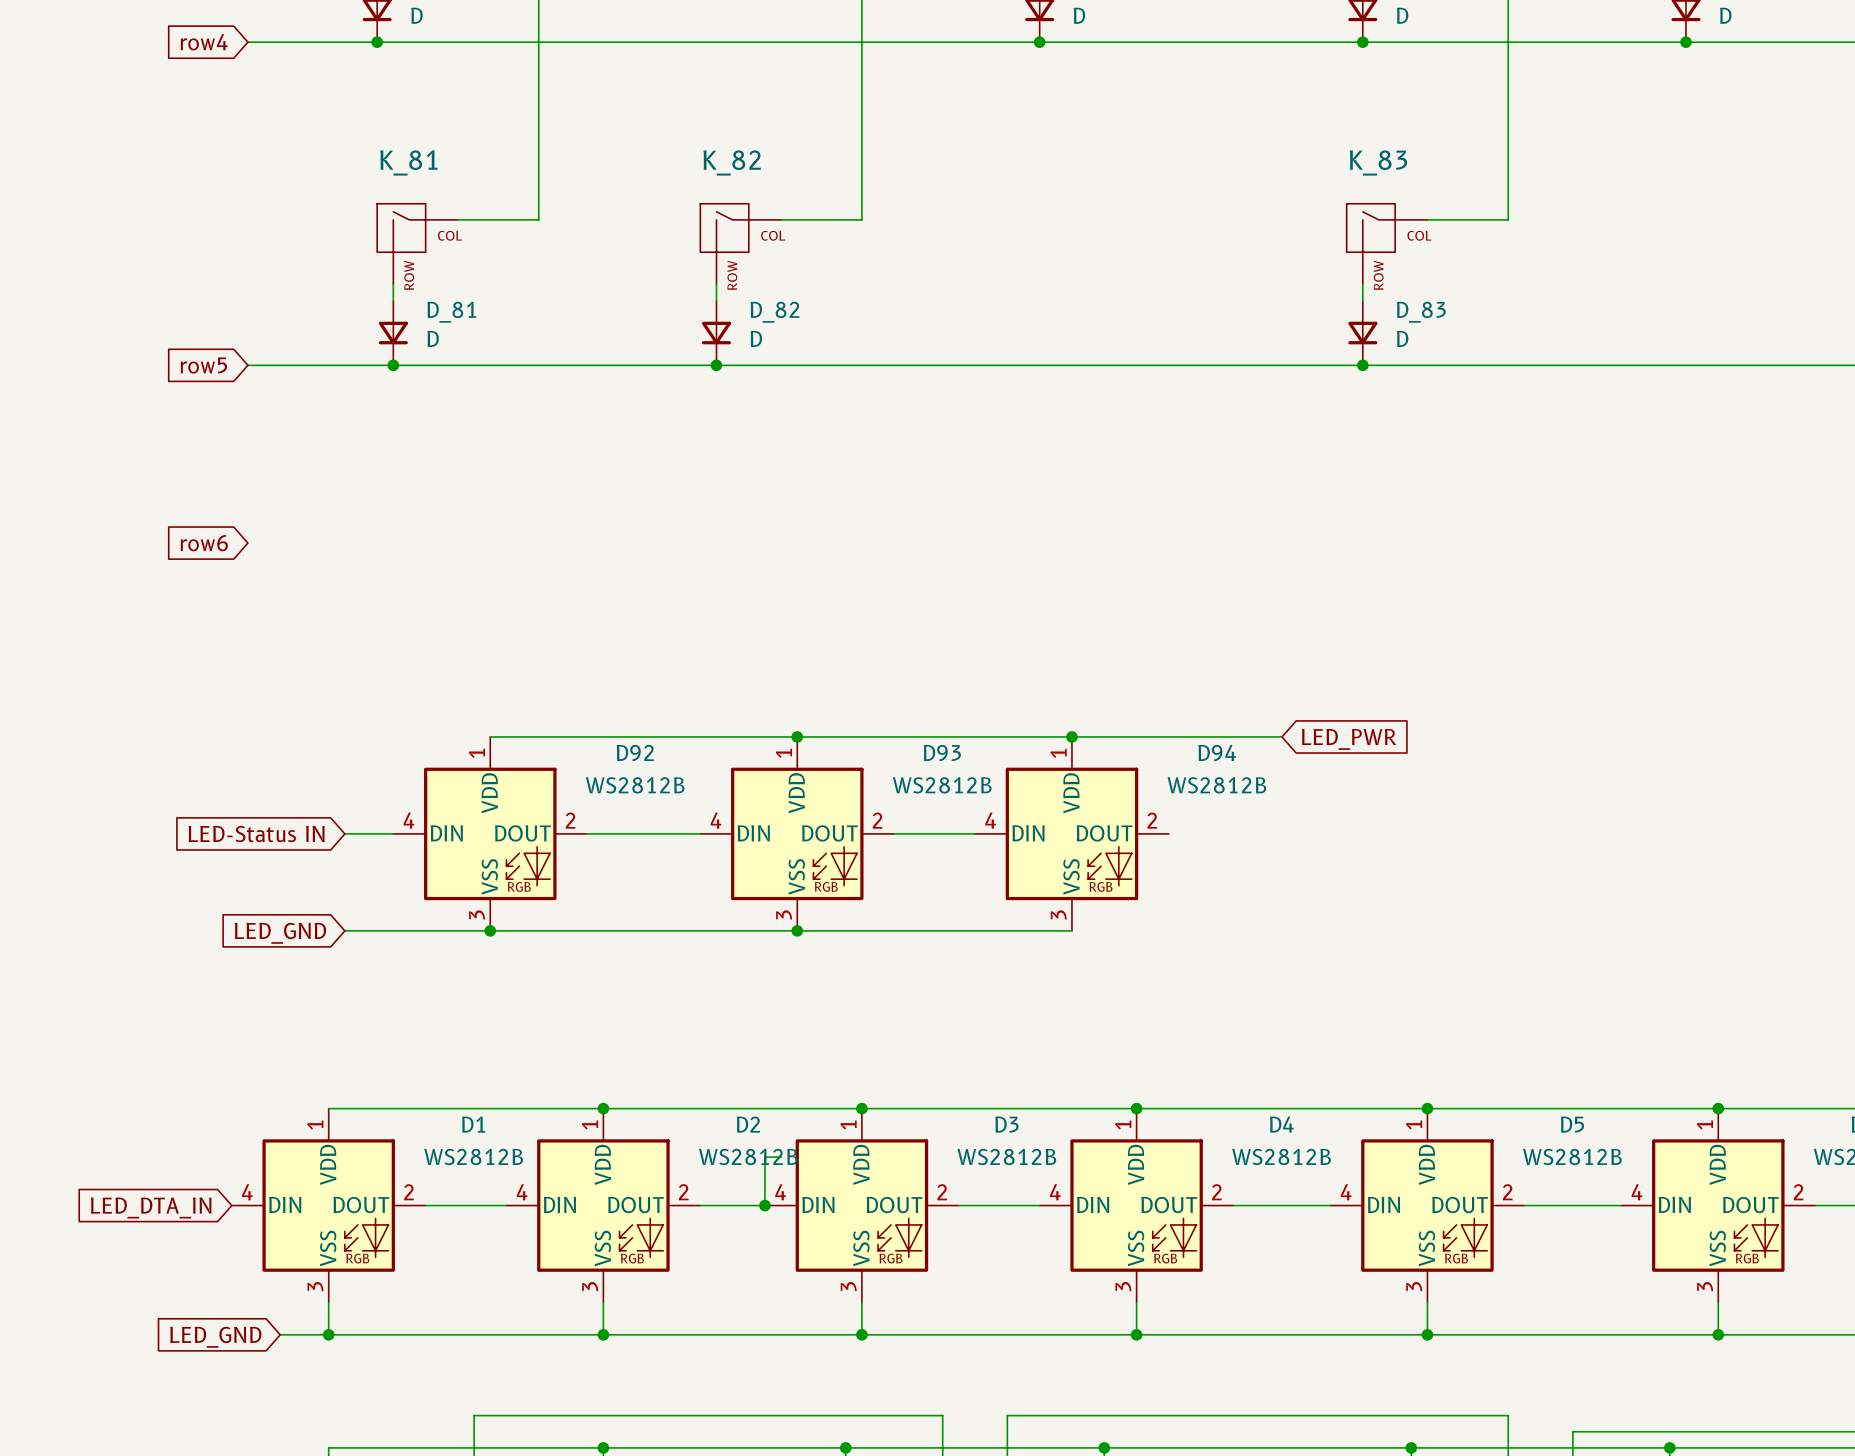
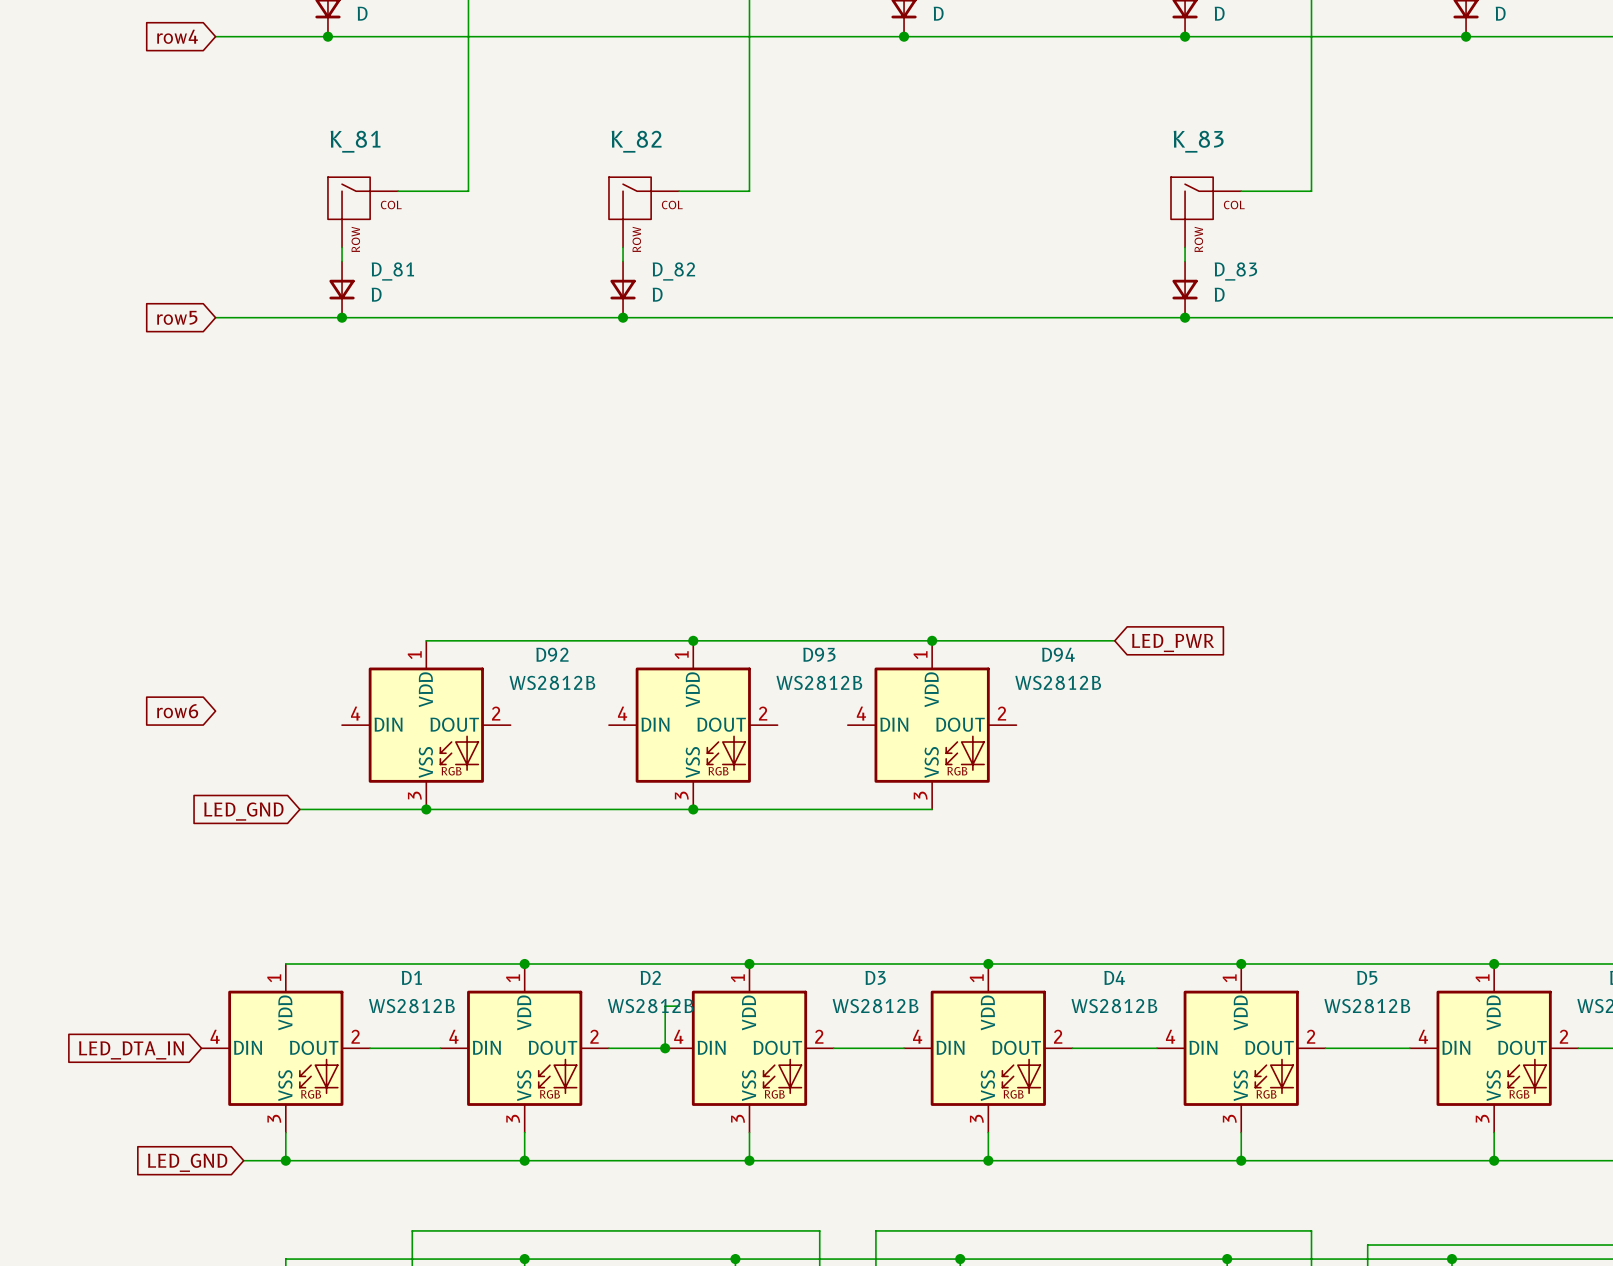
global label position: row6 (204, 543) -> row6 (177, 711)
wire: (344, 833) (393, 833) -> none
wire: (587, 833) (700, 833) -> none
wire: (894, 833) (975, 833) -> none
global label: LED-Status IN (256, 834) -> none

